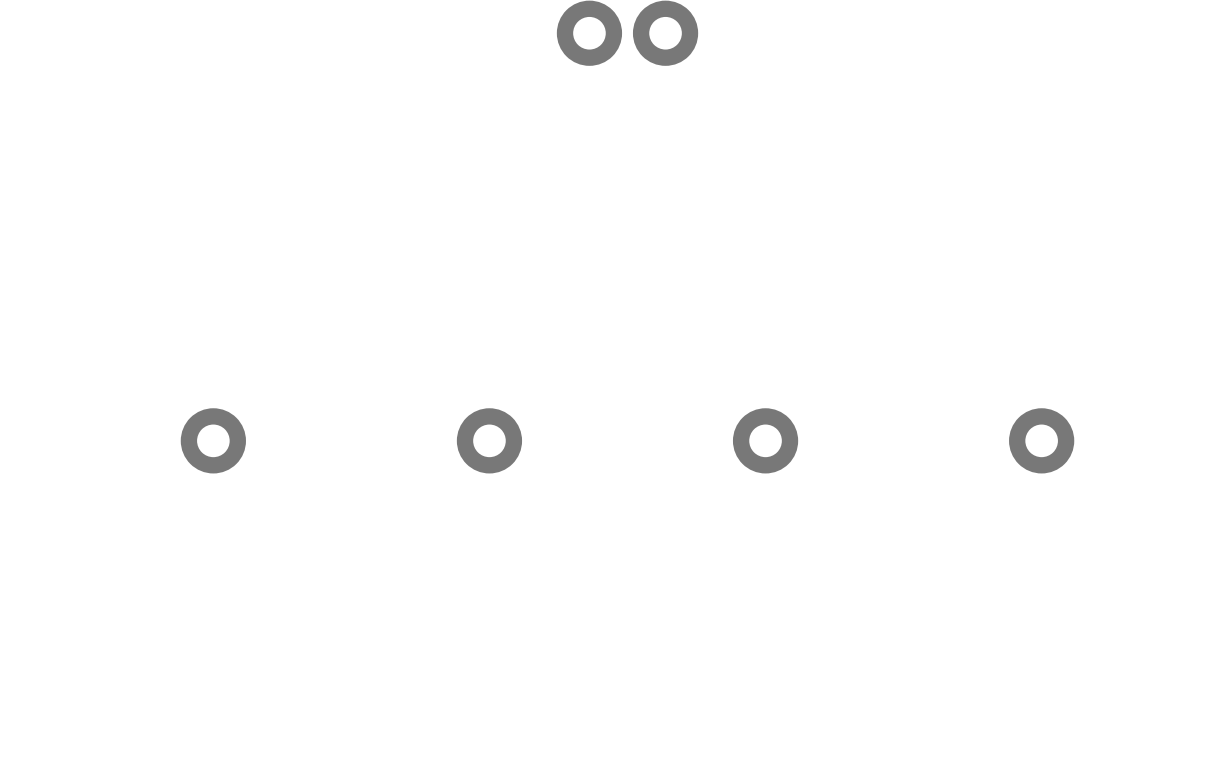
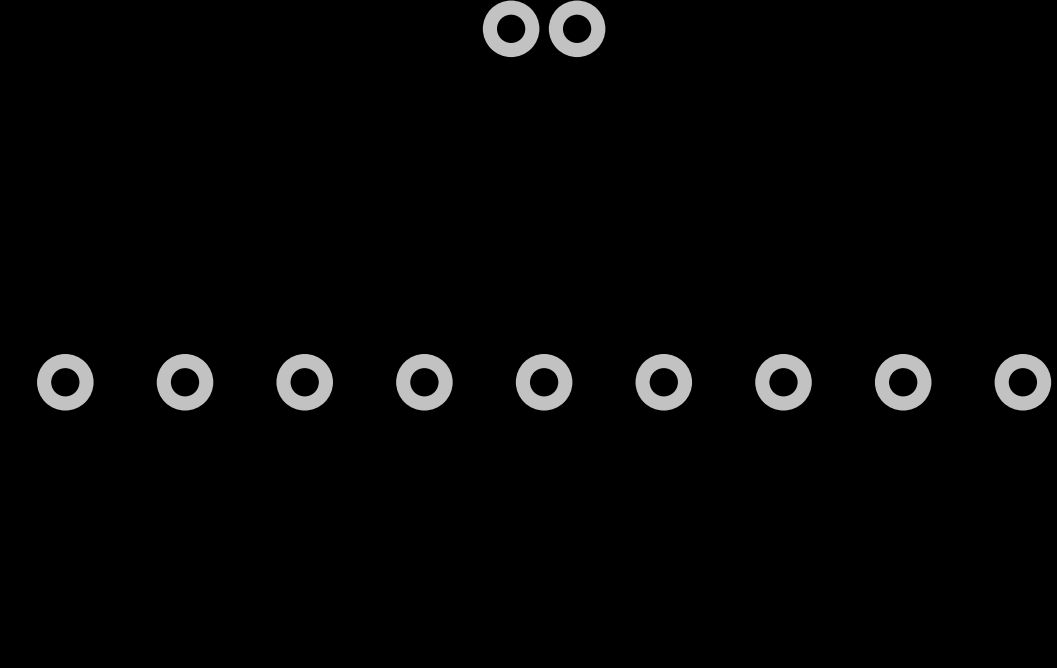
via: none -> (65, 382)
via: none -> (304, 382)
via: none -> (544, 382)
via: none -> (783, 382)
via: none -> (1022, 382)

